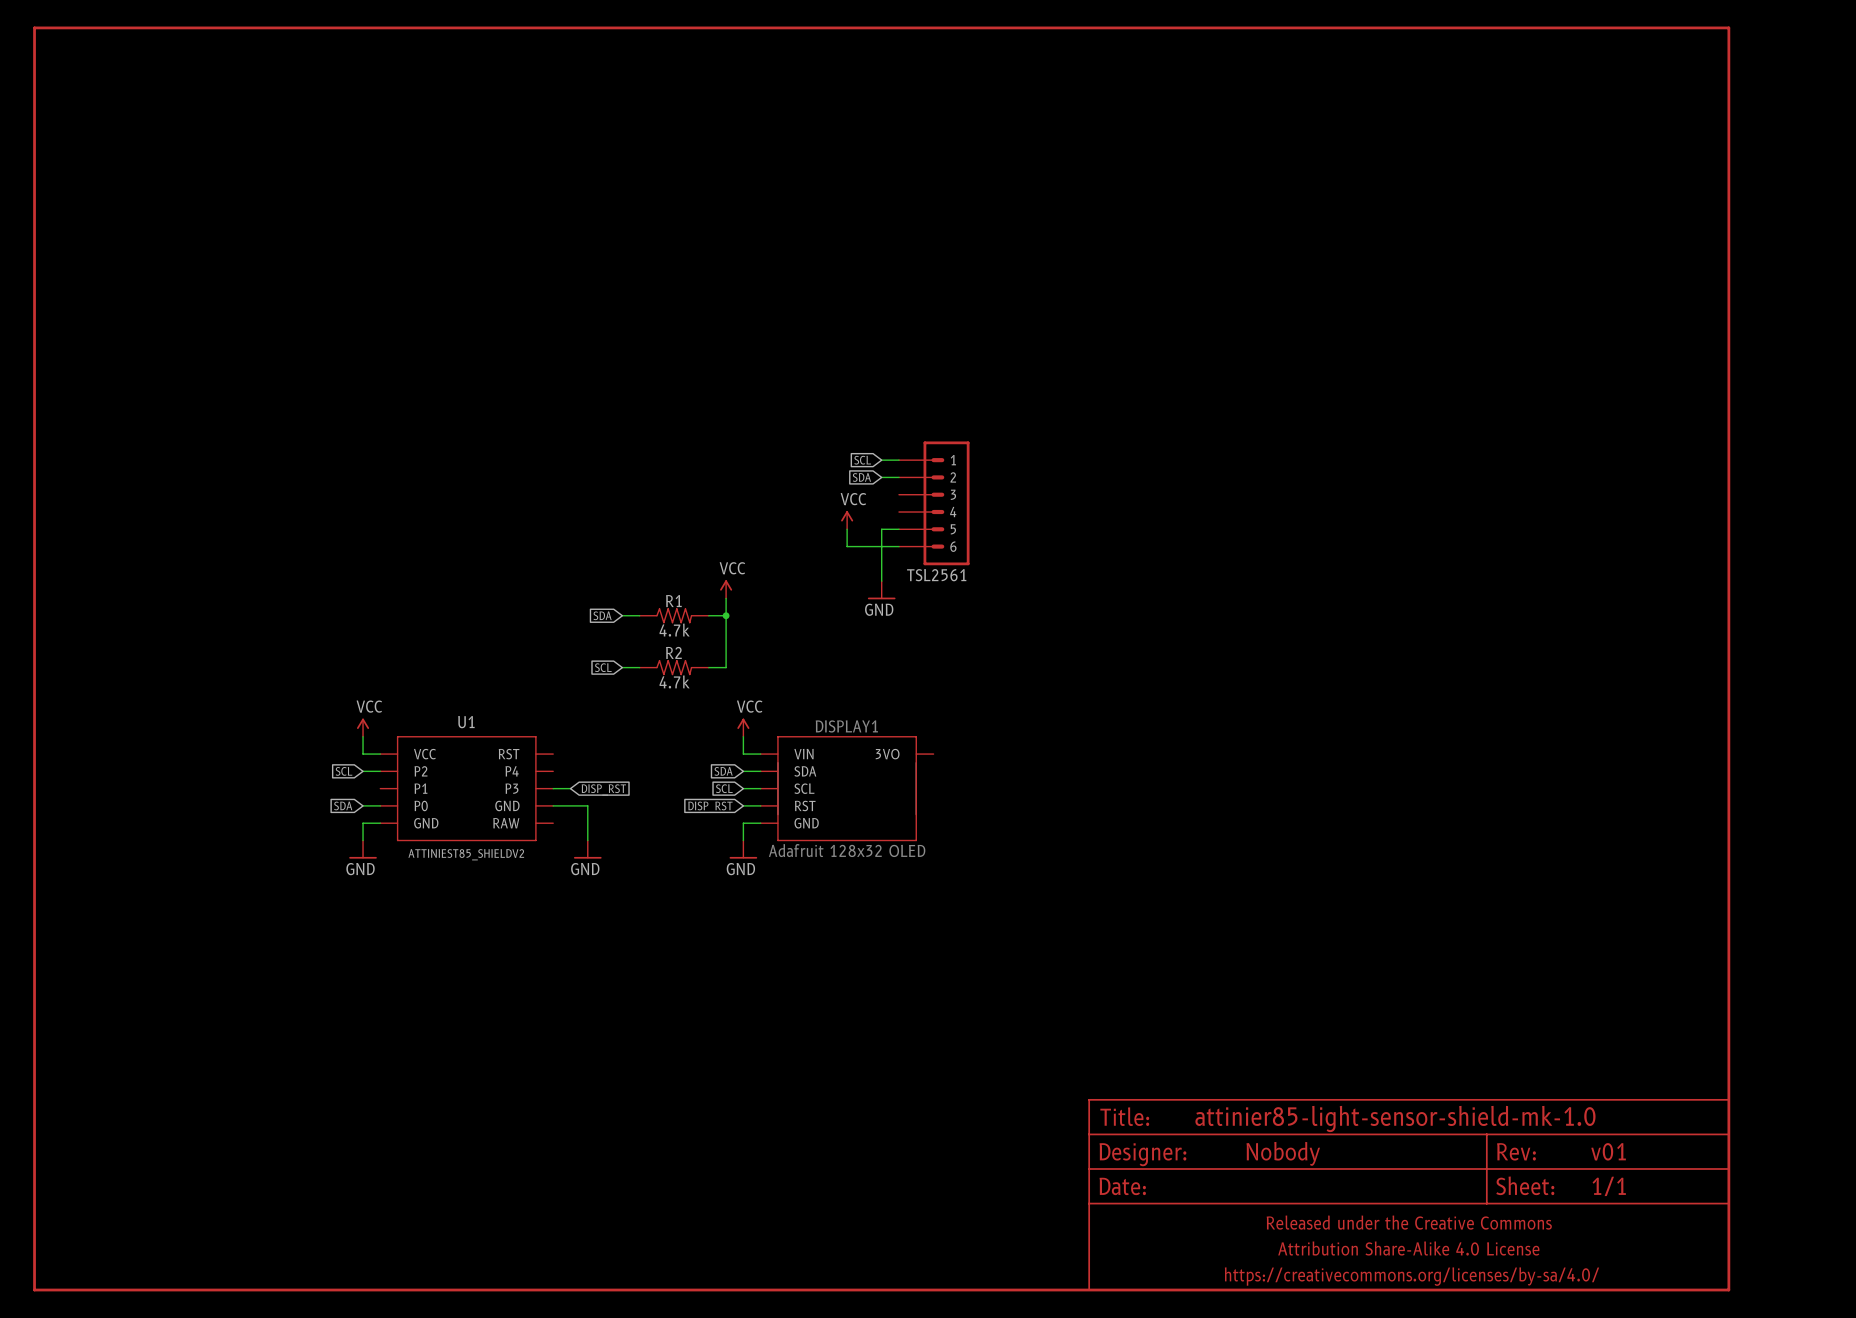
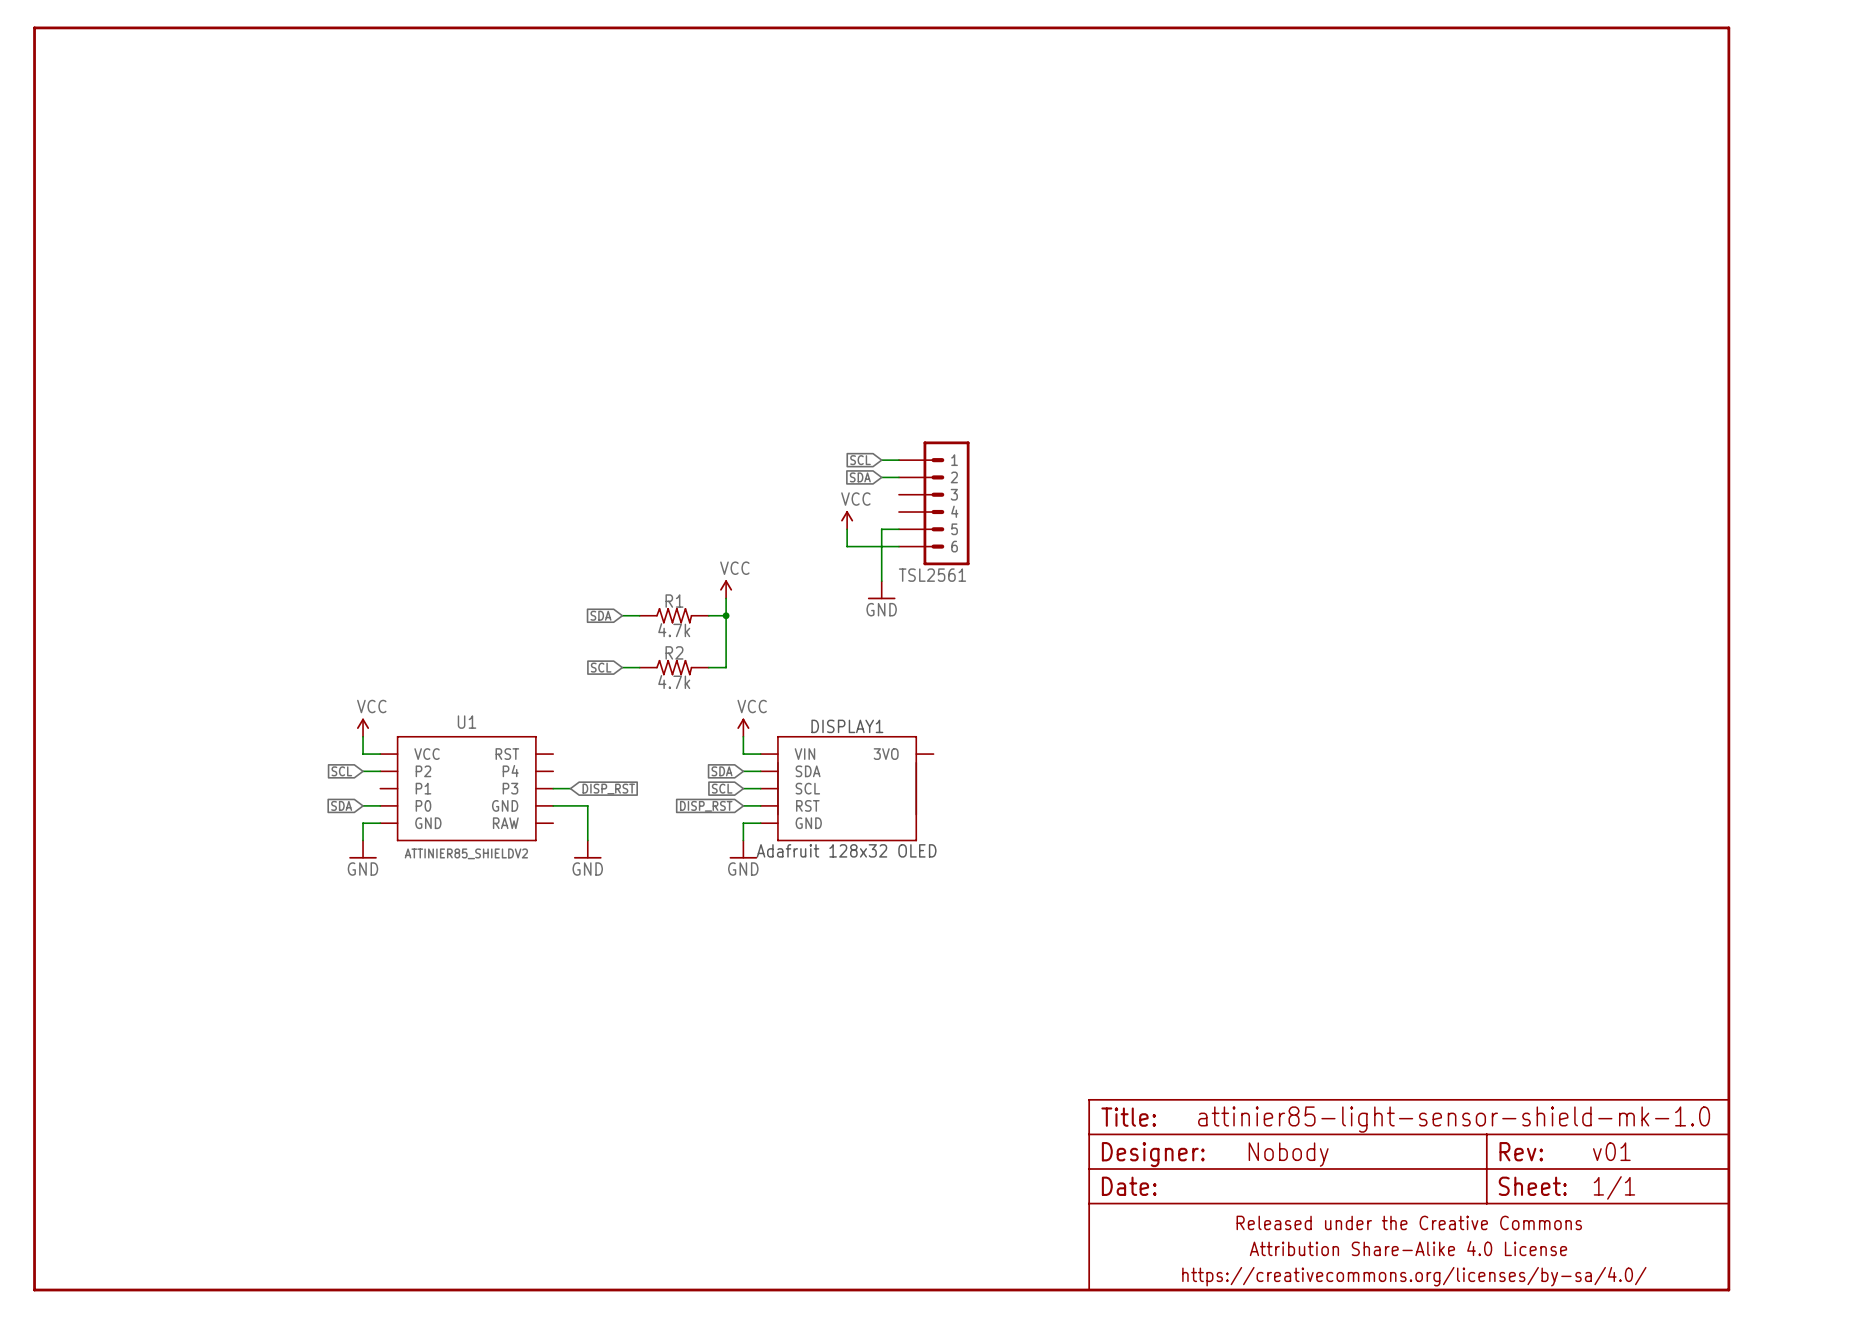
U1 value: ATTINIEST85_SHIELDV2 (466, 854) -> ATTINIER85_SHIELDV2 (466, 853)

